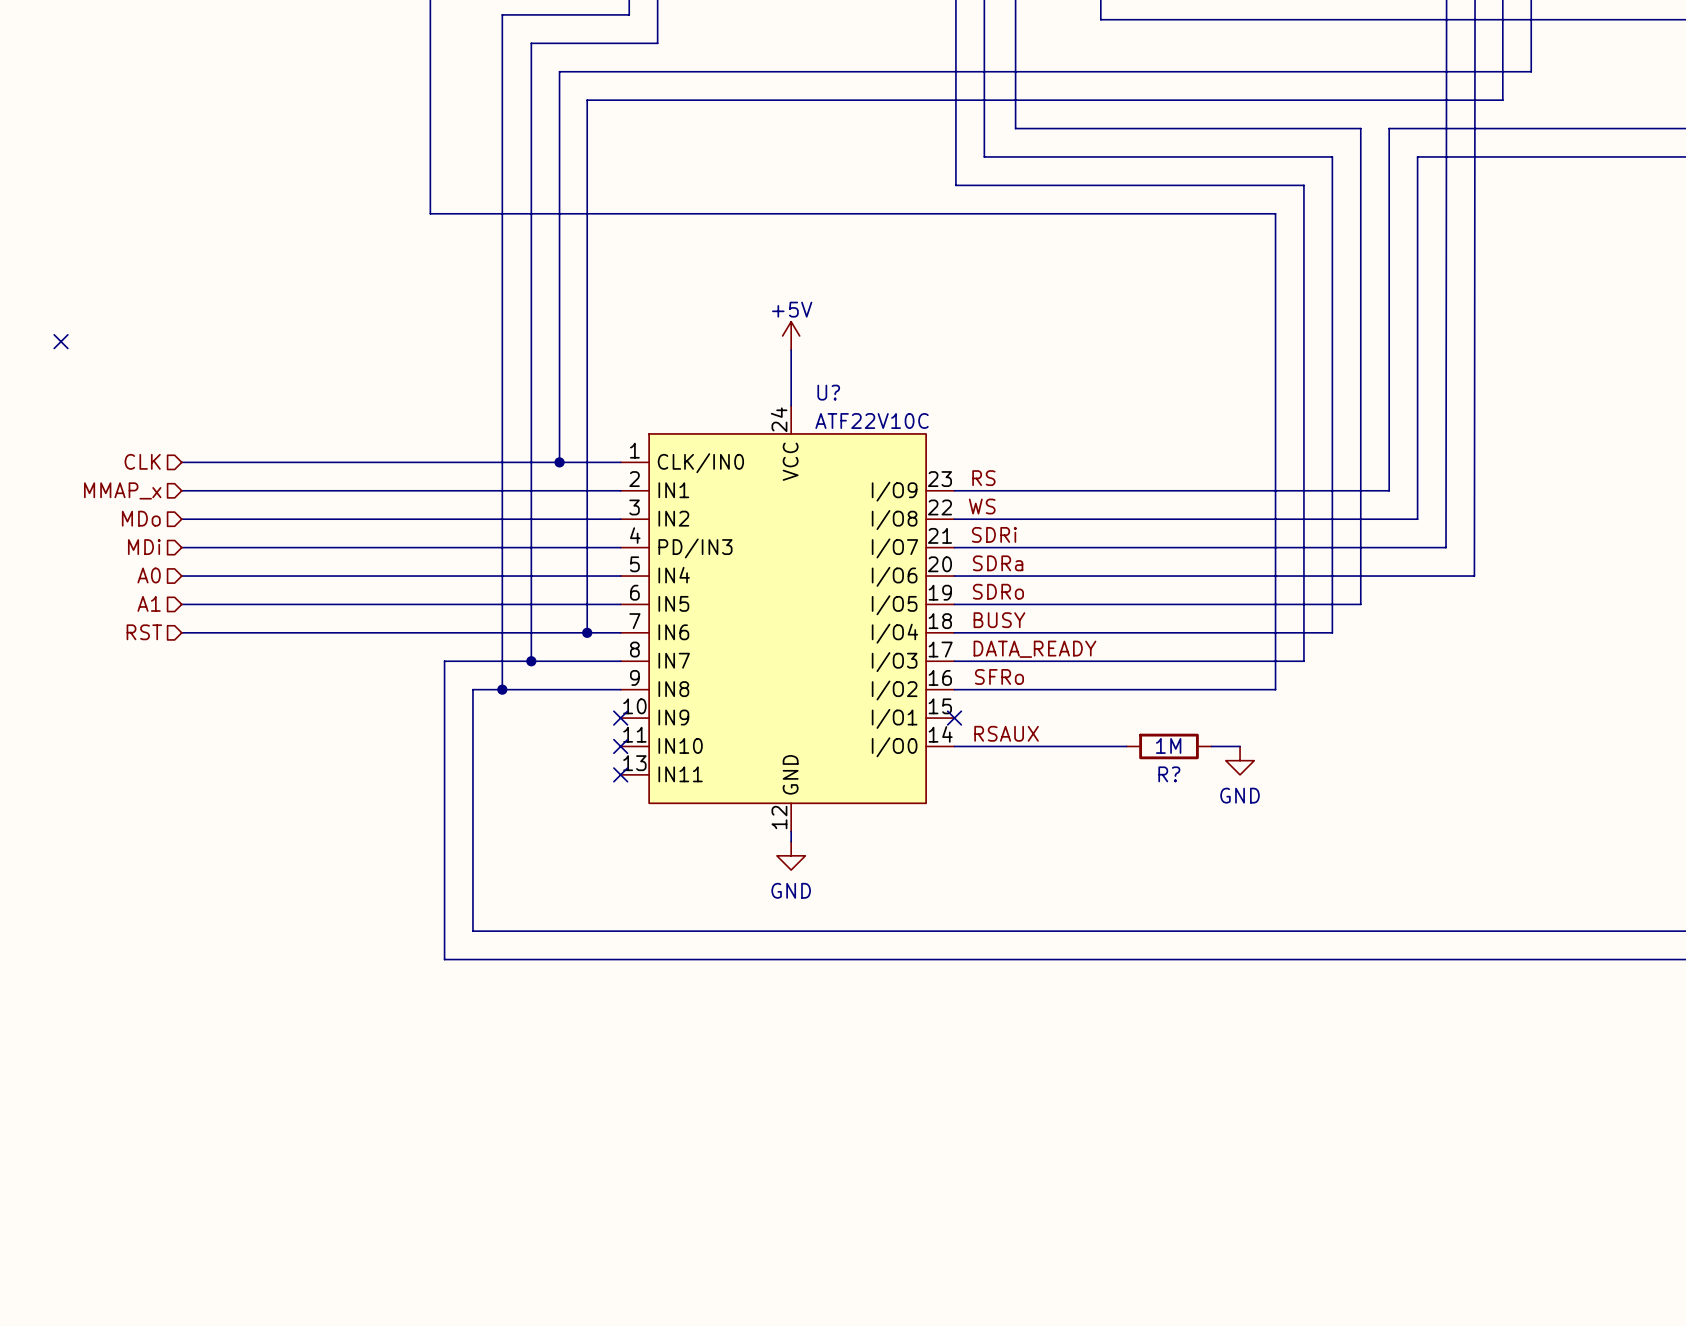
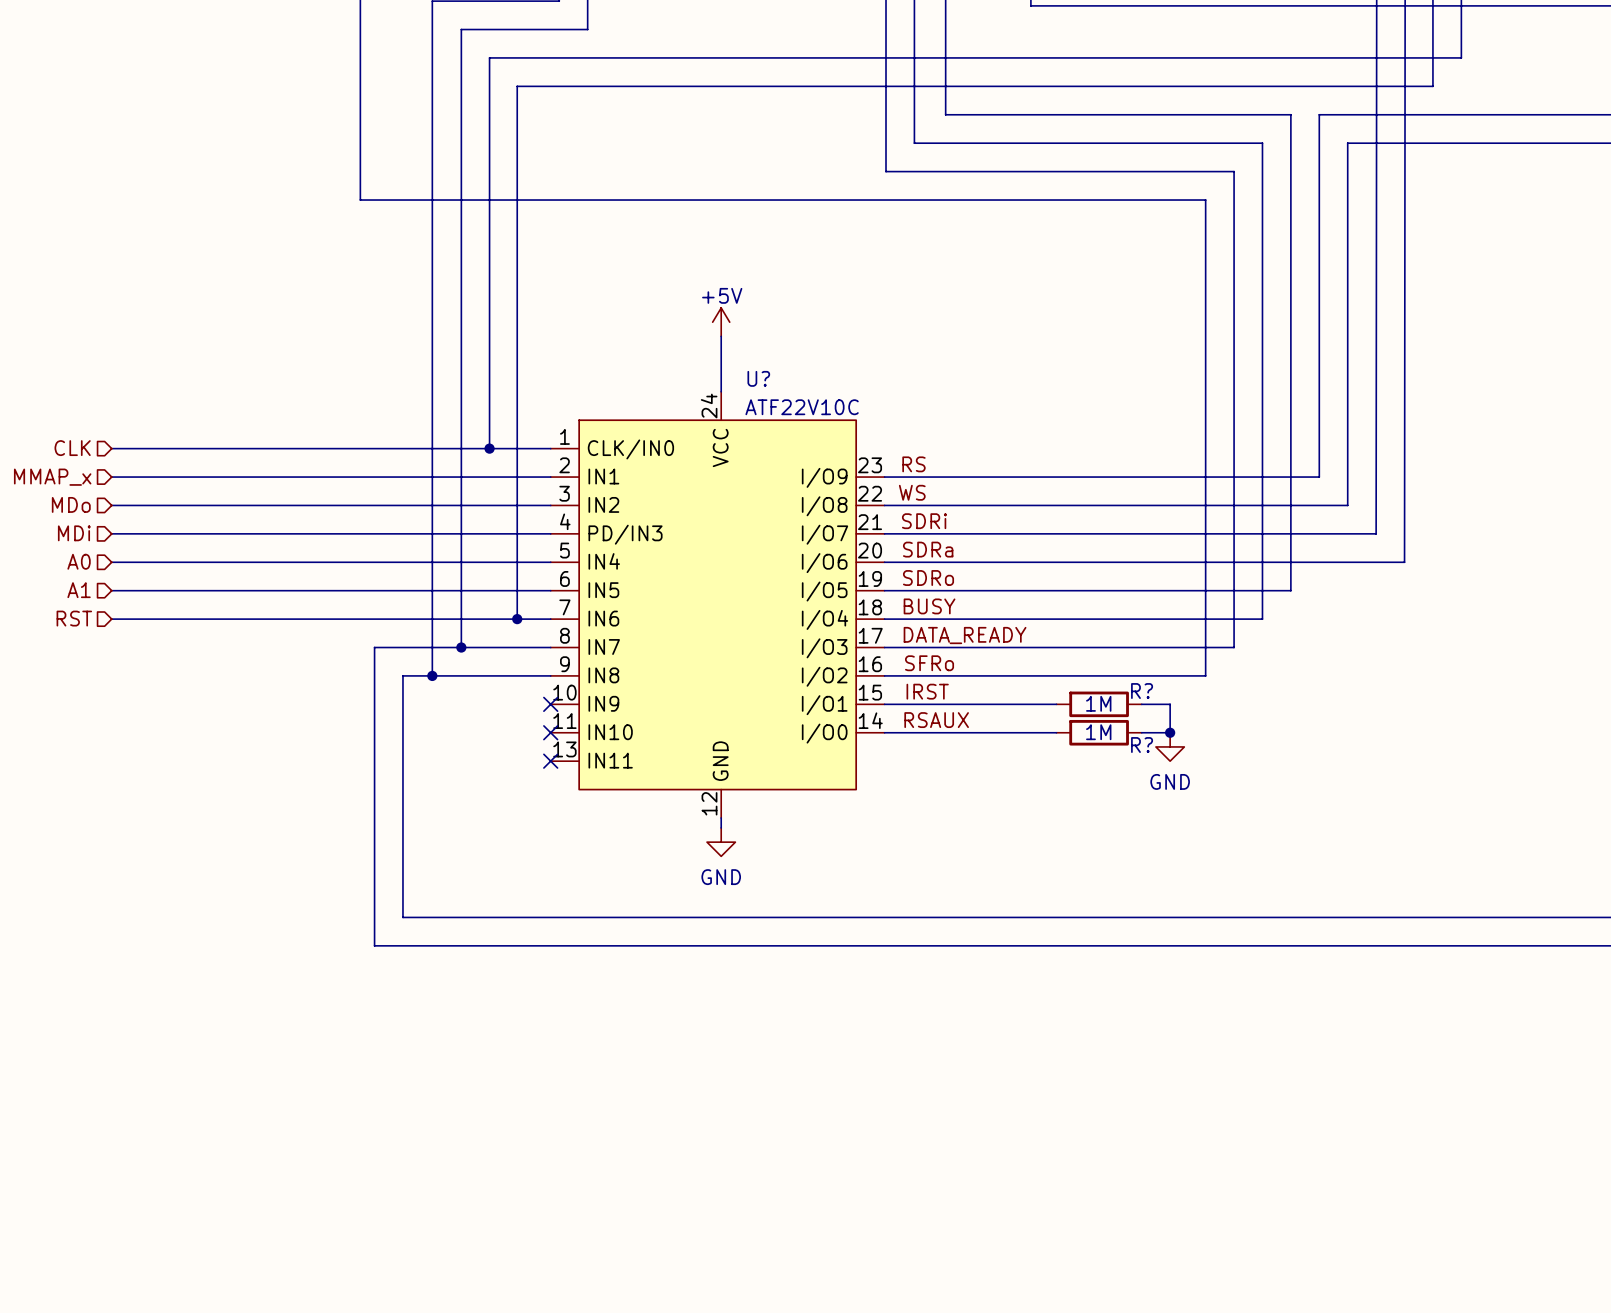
label: none -> IRST (927, 691)
wire: none -> (884, 704) (1056, 704)
no-connect mark: (954, 718) -> none
R?: none -> 1M (1099, 704)
wire: none -> (1141, 704) (1170, 704) (1170, 732)
junction: none -> (1170, 732)
R? name position: R? (1169, 774) -> R? (1142, 745)

